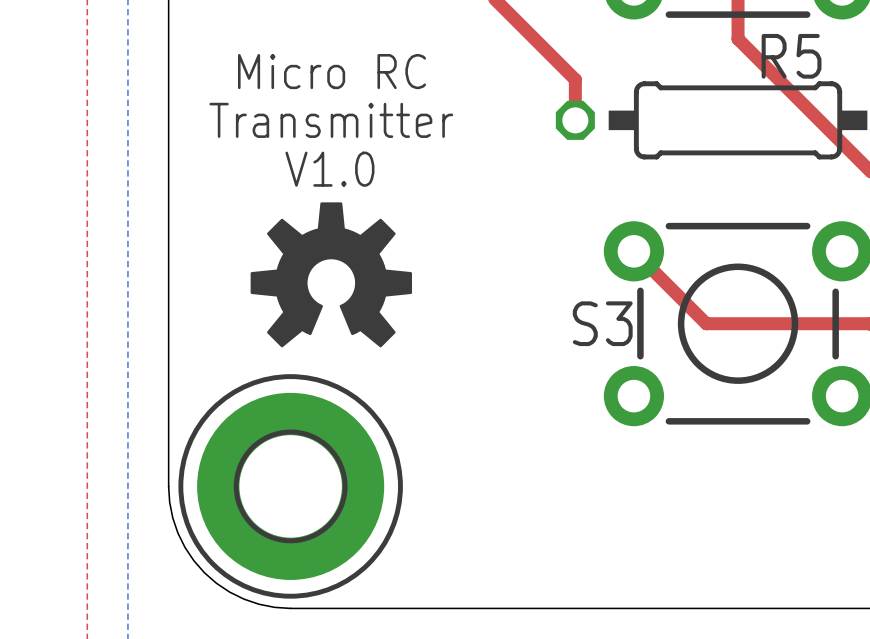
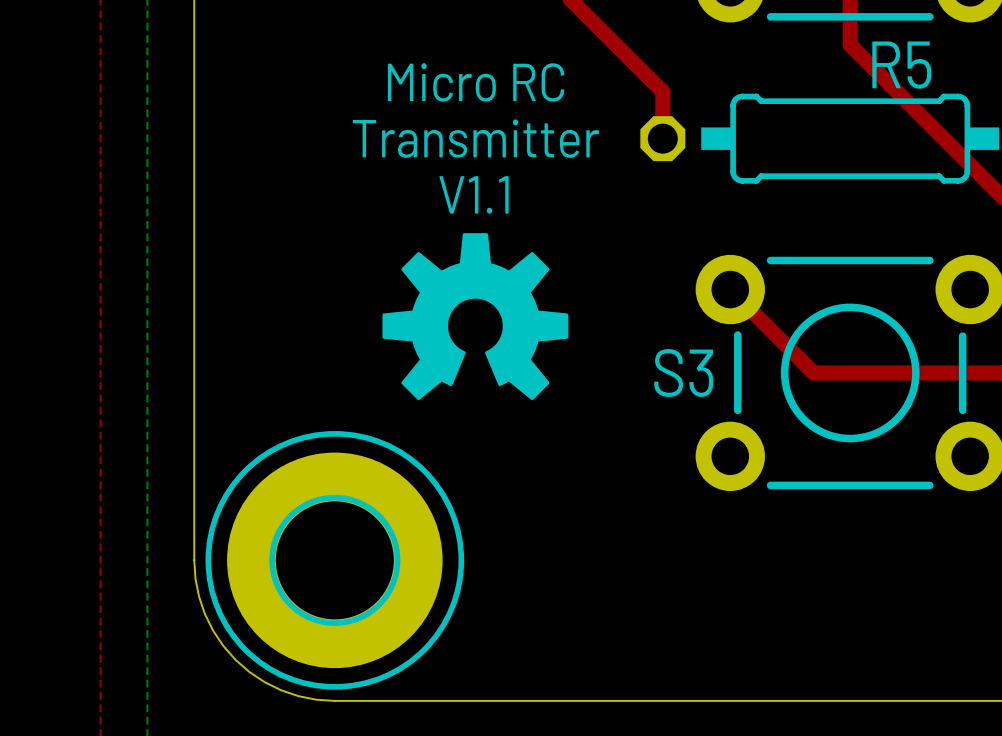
text position: Micro RC (332, 71) -> Micro RC (476, 82)
text position: Transmitter (331, 120) -> Transmitter (476, 138)
text: V1.0 (329, 169) -> V1.1 (474, 194)
drawing position: (331, 274) -> (475, 316)

